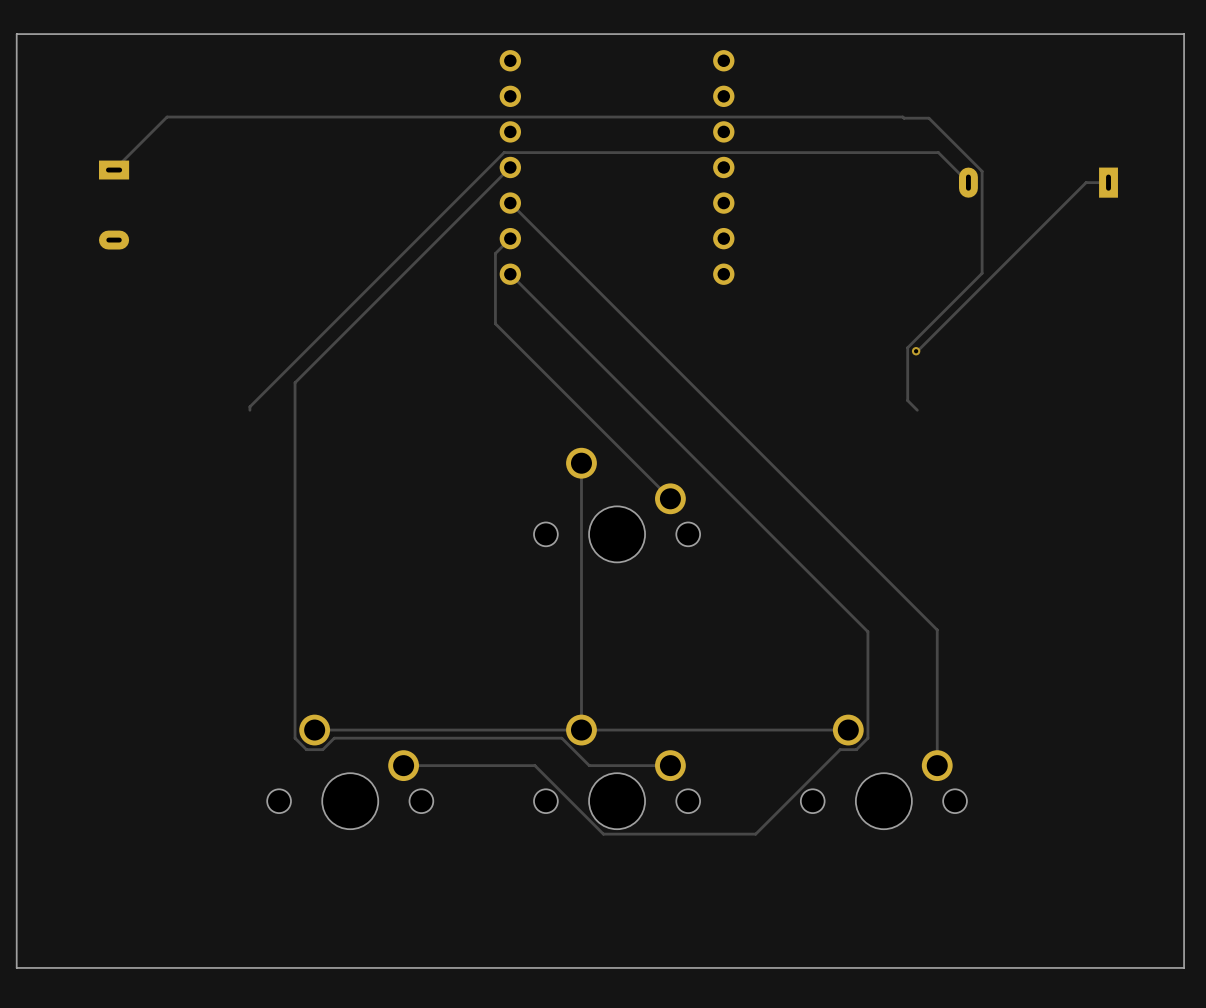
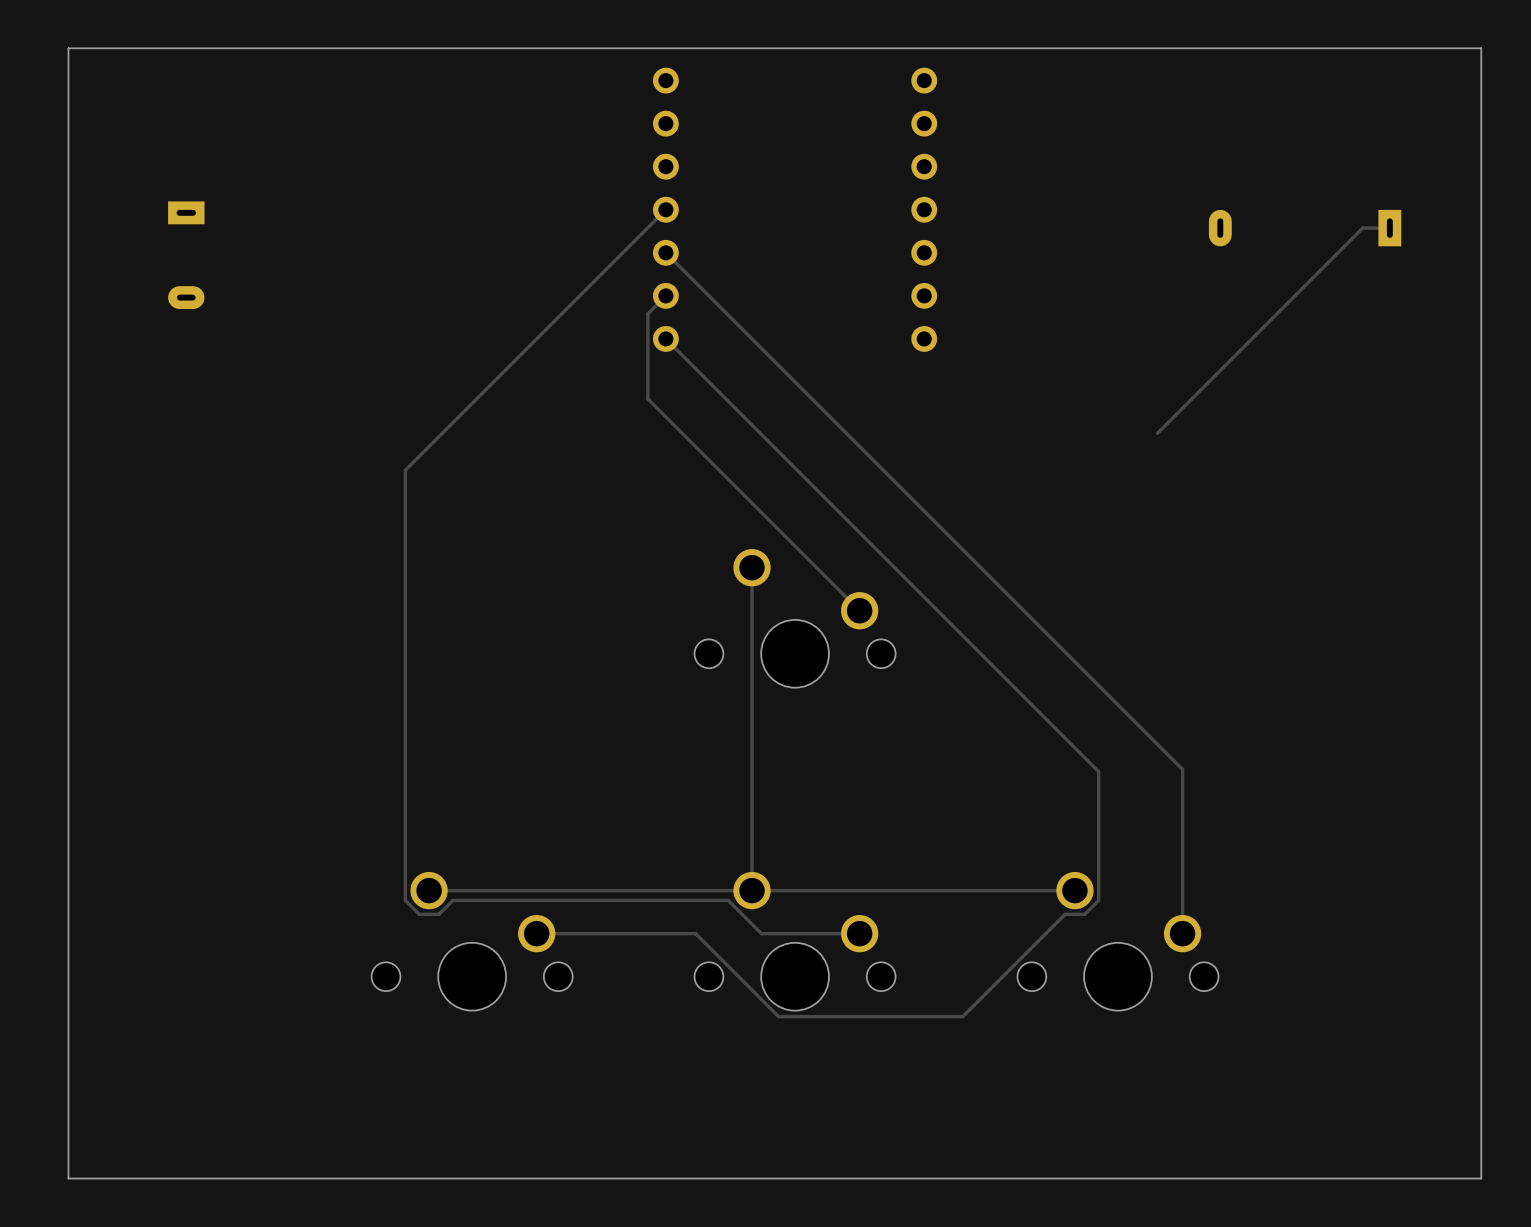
track: (114, 170) (167, 117) (928, 118) (982, 171) (982, 273) (907, 347) (907, 400) (917, 410) -> none
track: (968, 182) (938, 152) (504, 152) (249, 406) (249, 410) -> none
via: (916, 351) -> none

